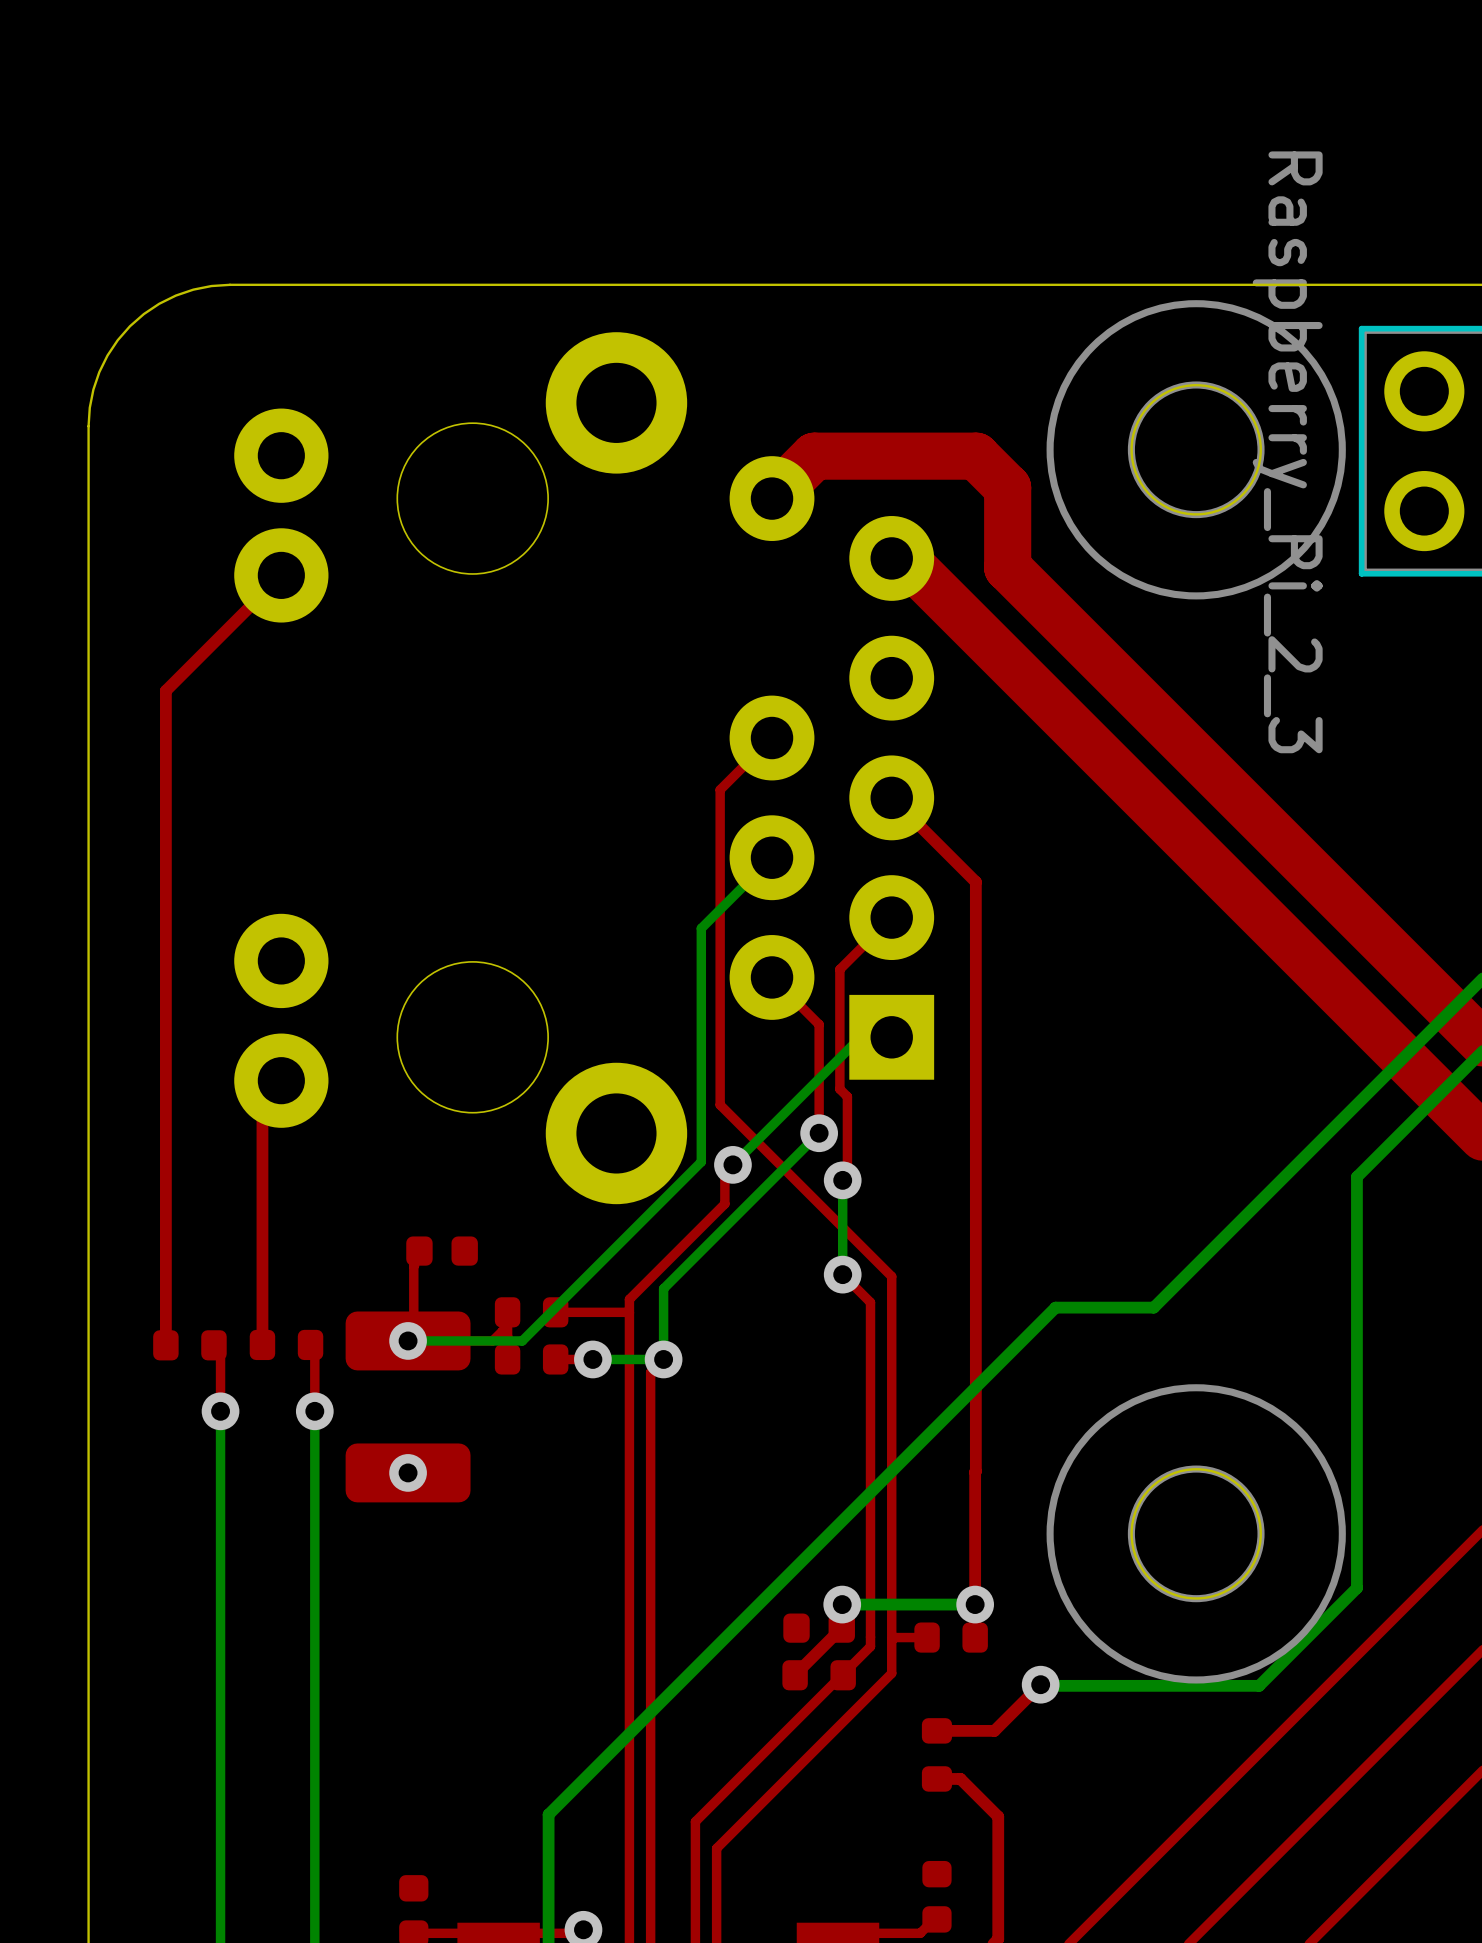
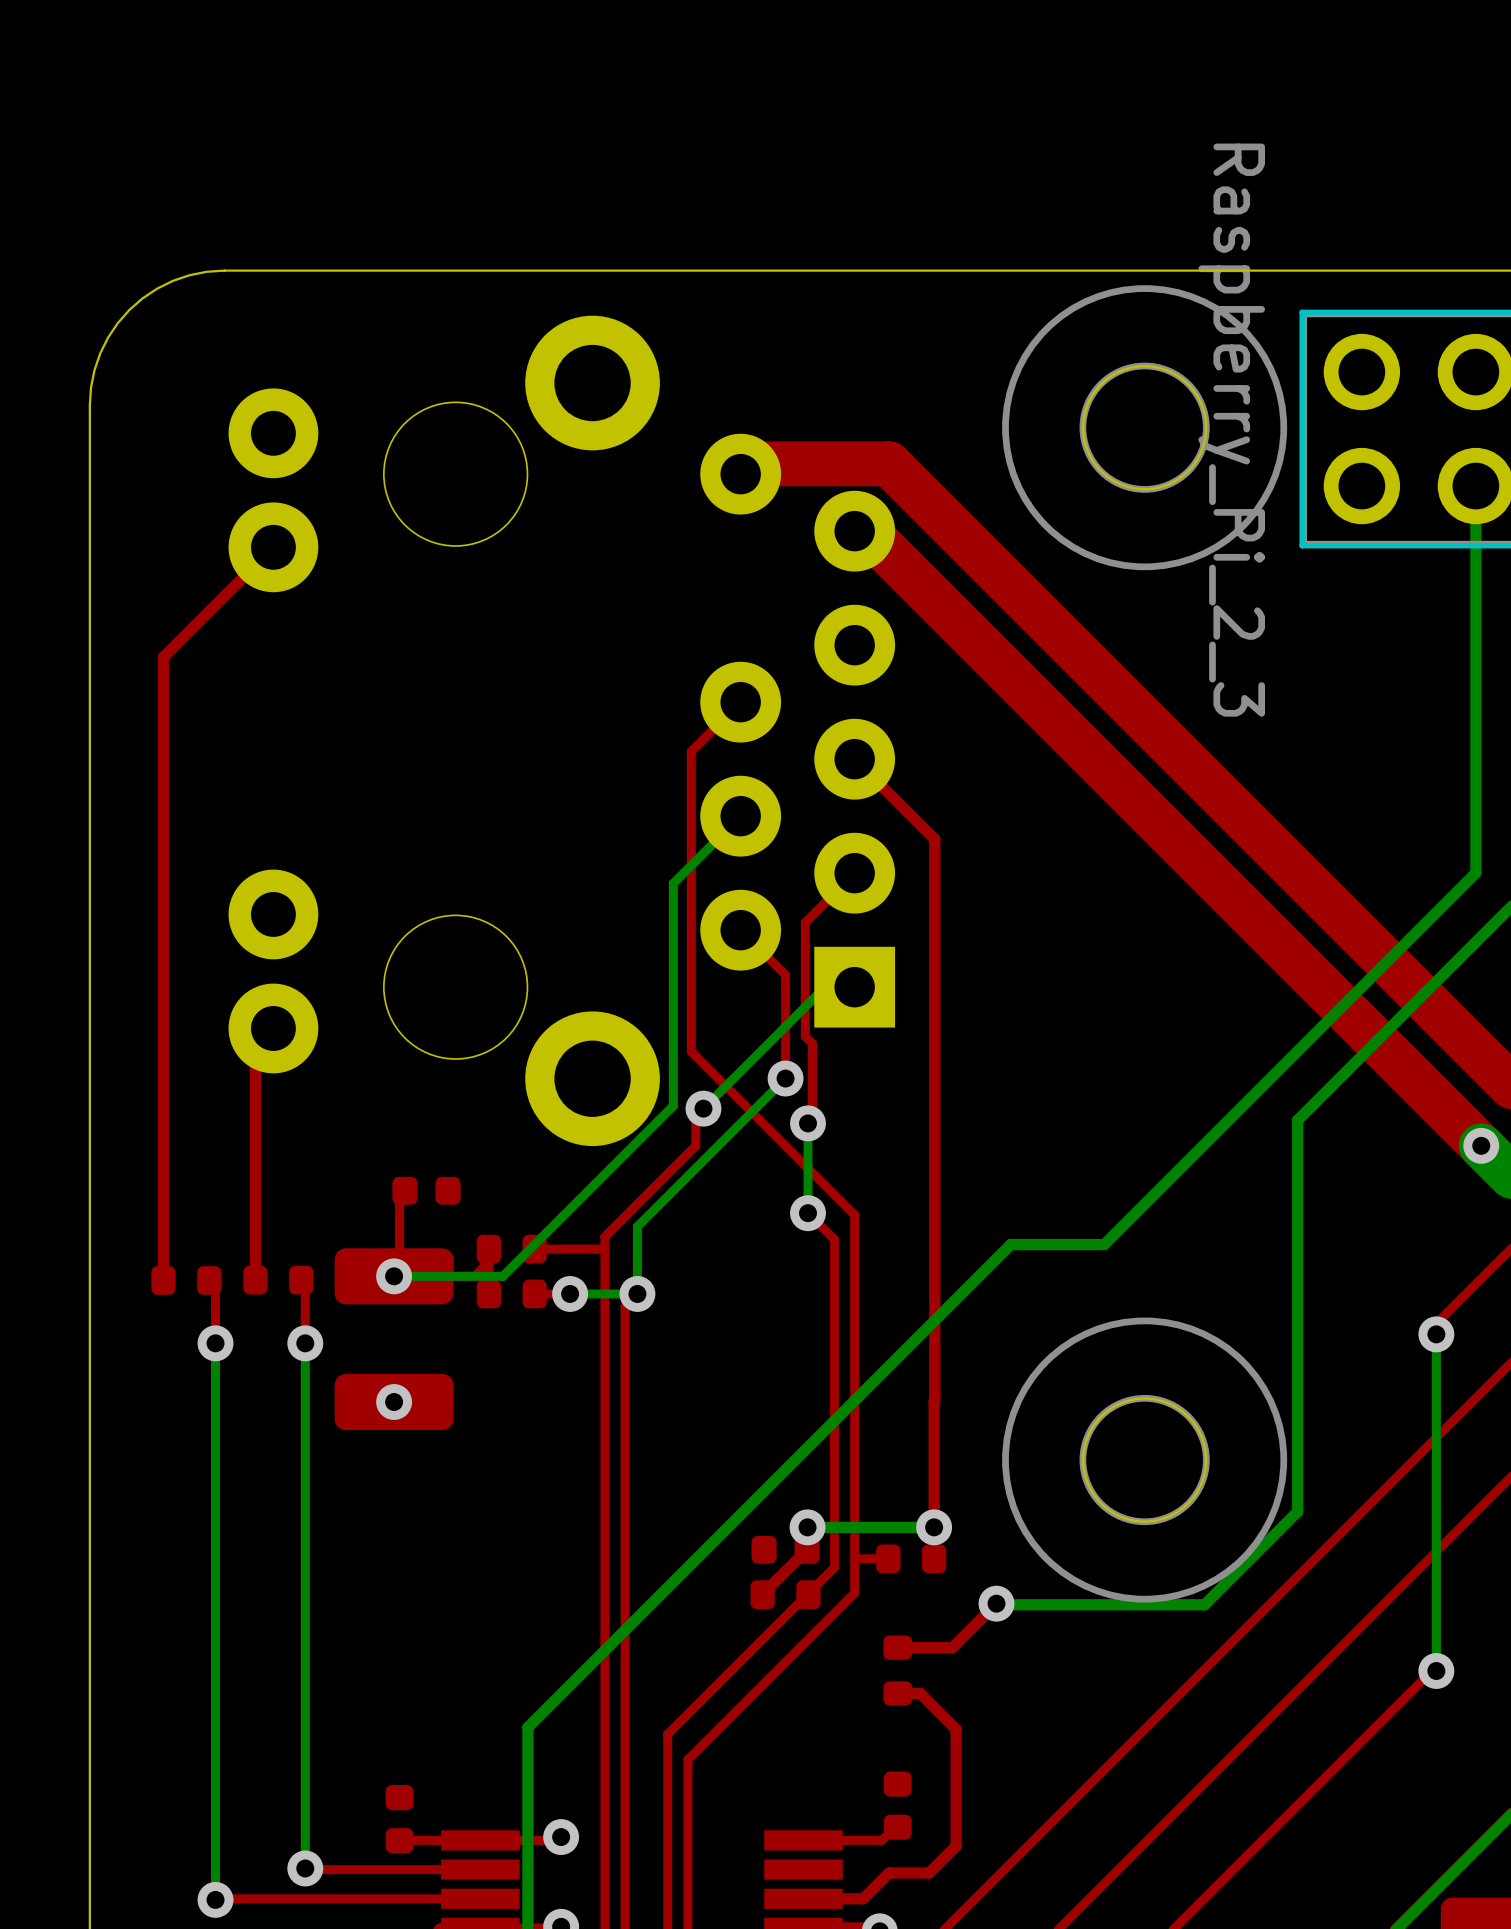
top track: (782, 487) (814, 456) (976, 456) (1007, 487) (1007, 567) -> (750, 463) (889, 463) (965, 539)

